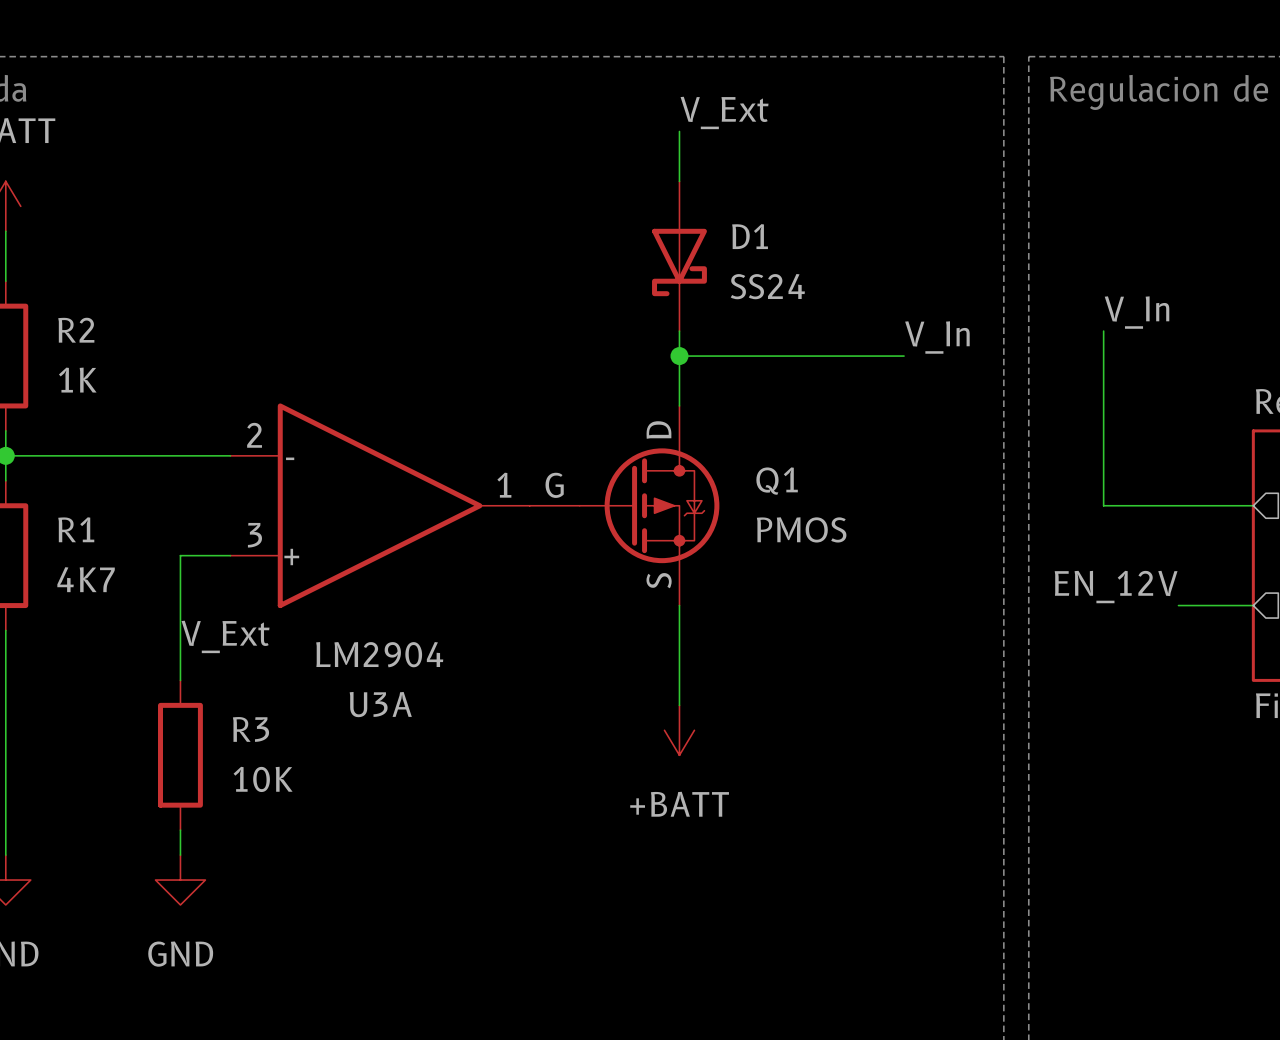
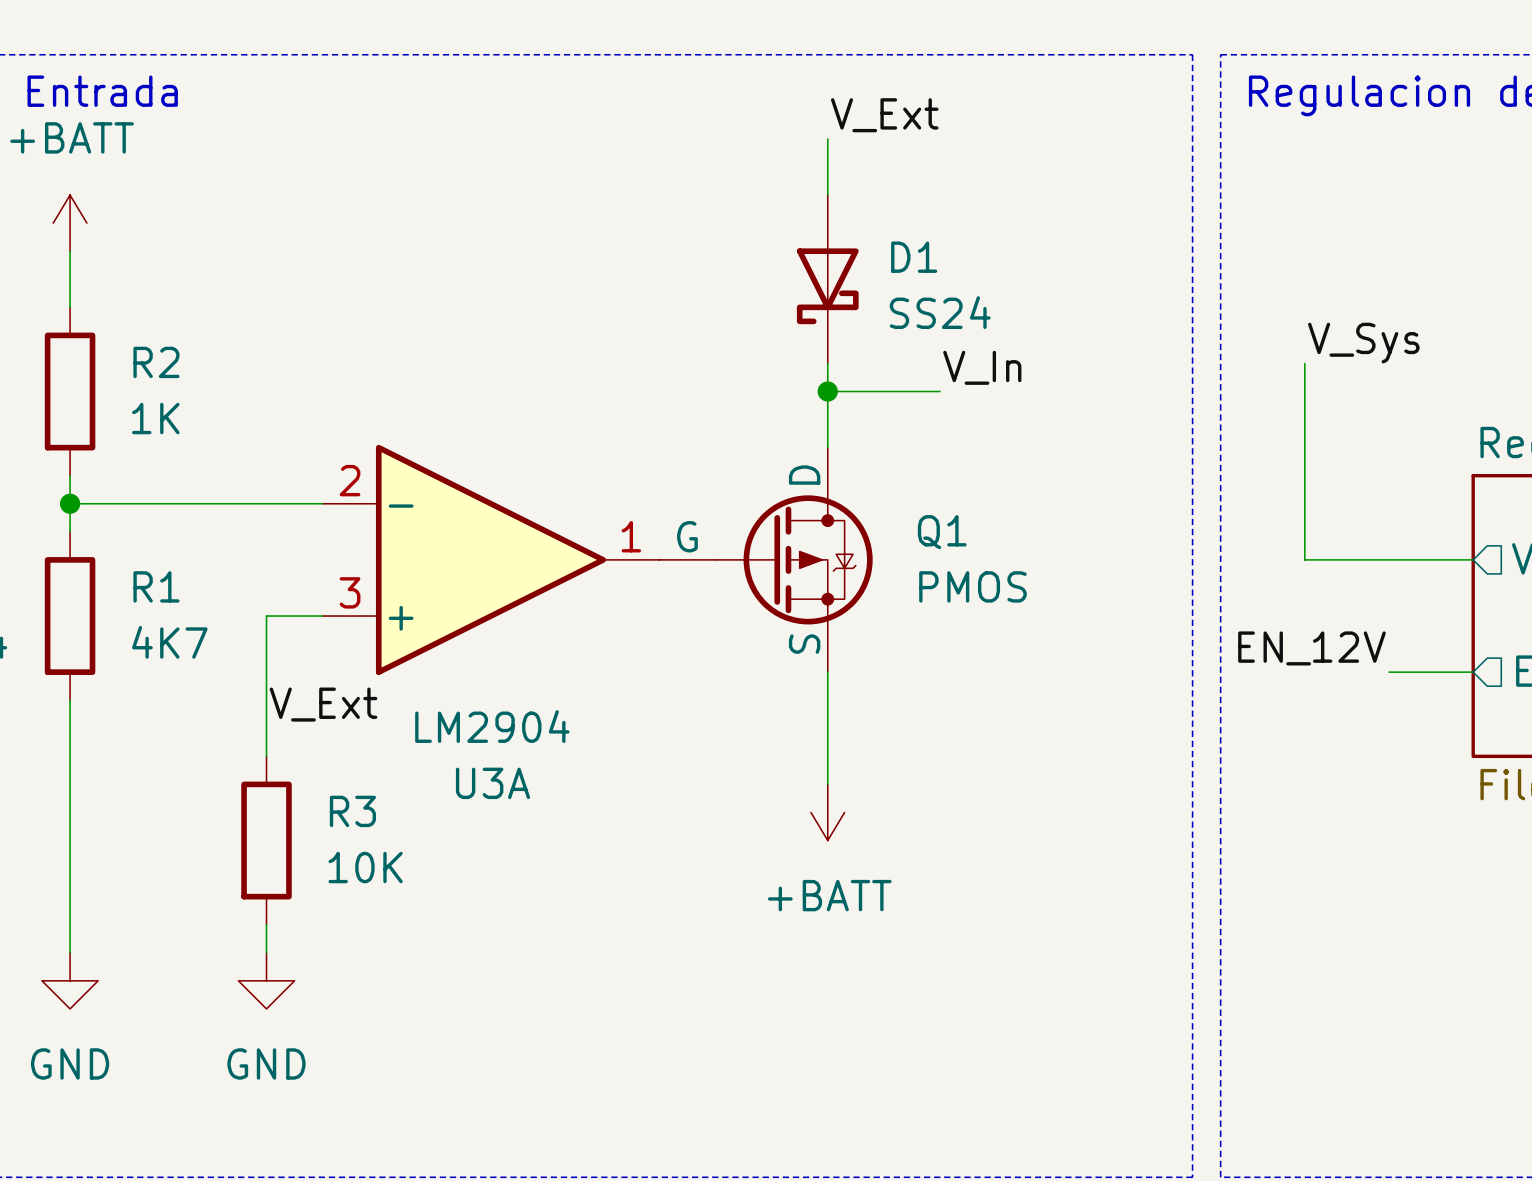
label: V_In (1137, 312) -> V_Sys (1363, 343)
label position: V_In (937, 337) -> V_In (982, 367)
wire: (779, 356) (904, 356) -> none

